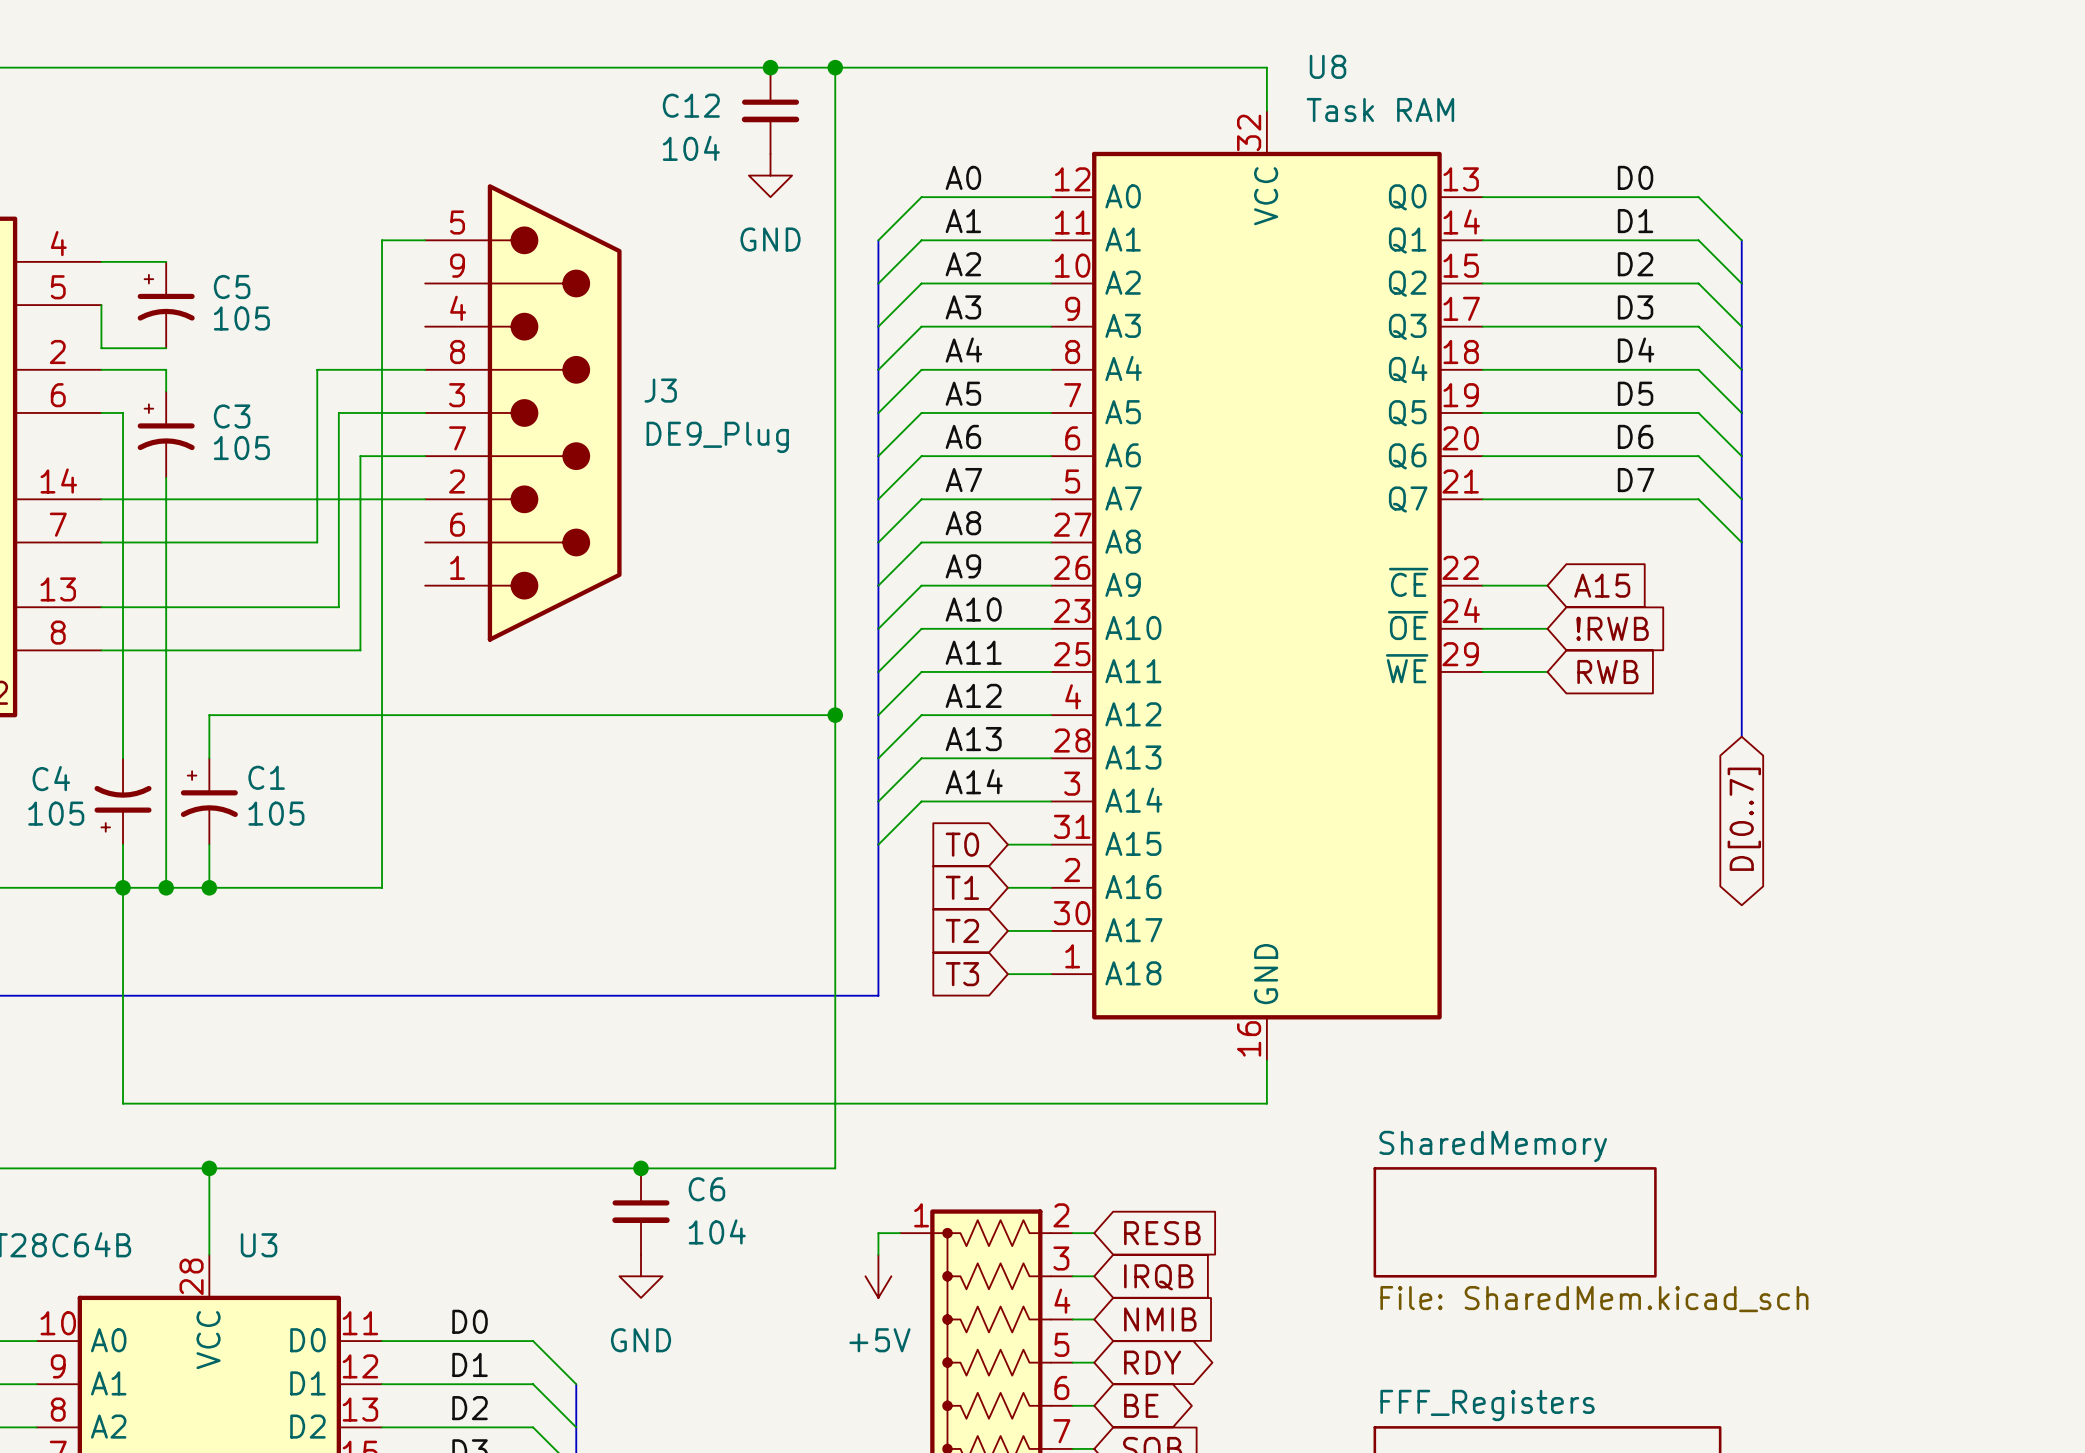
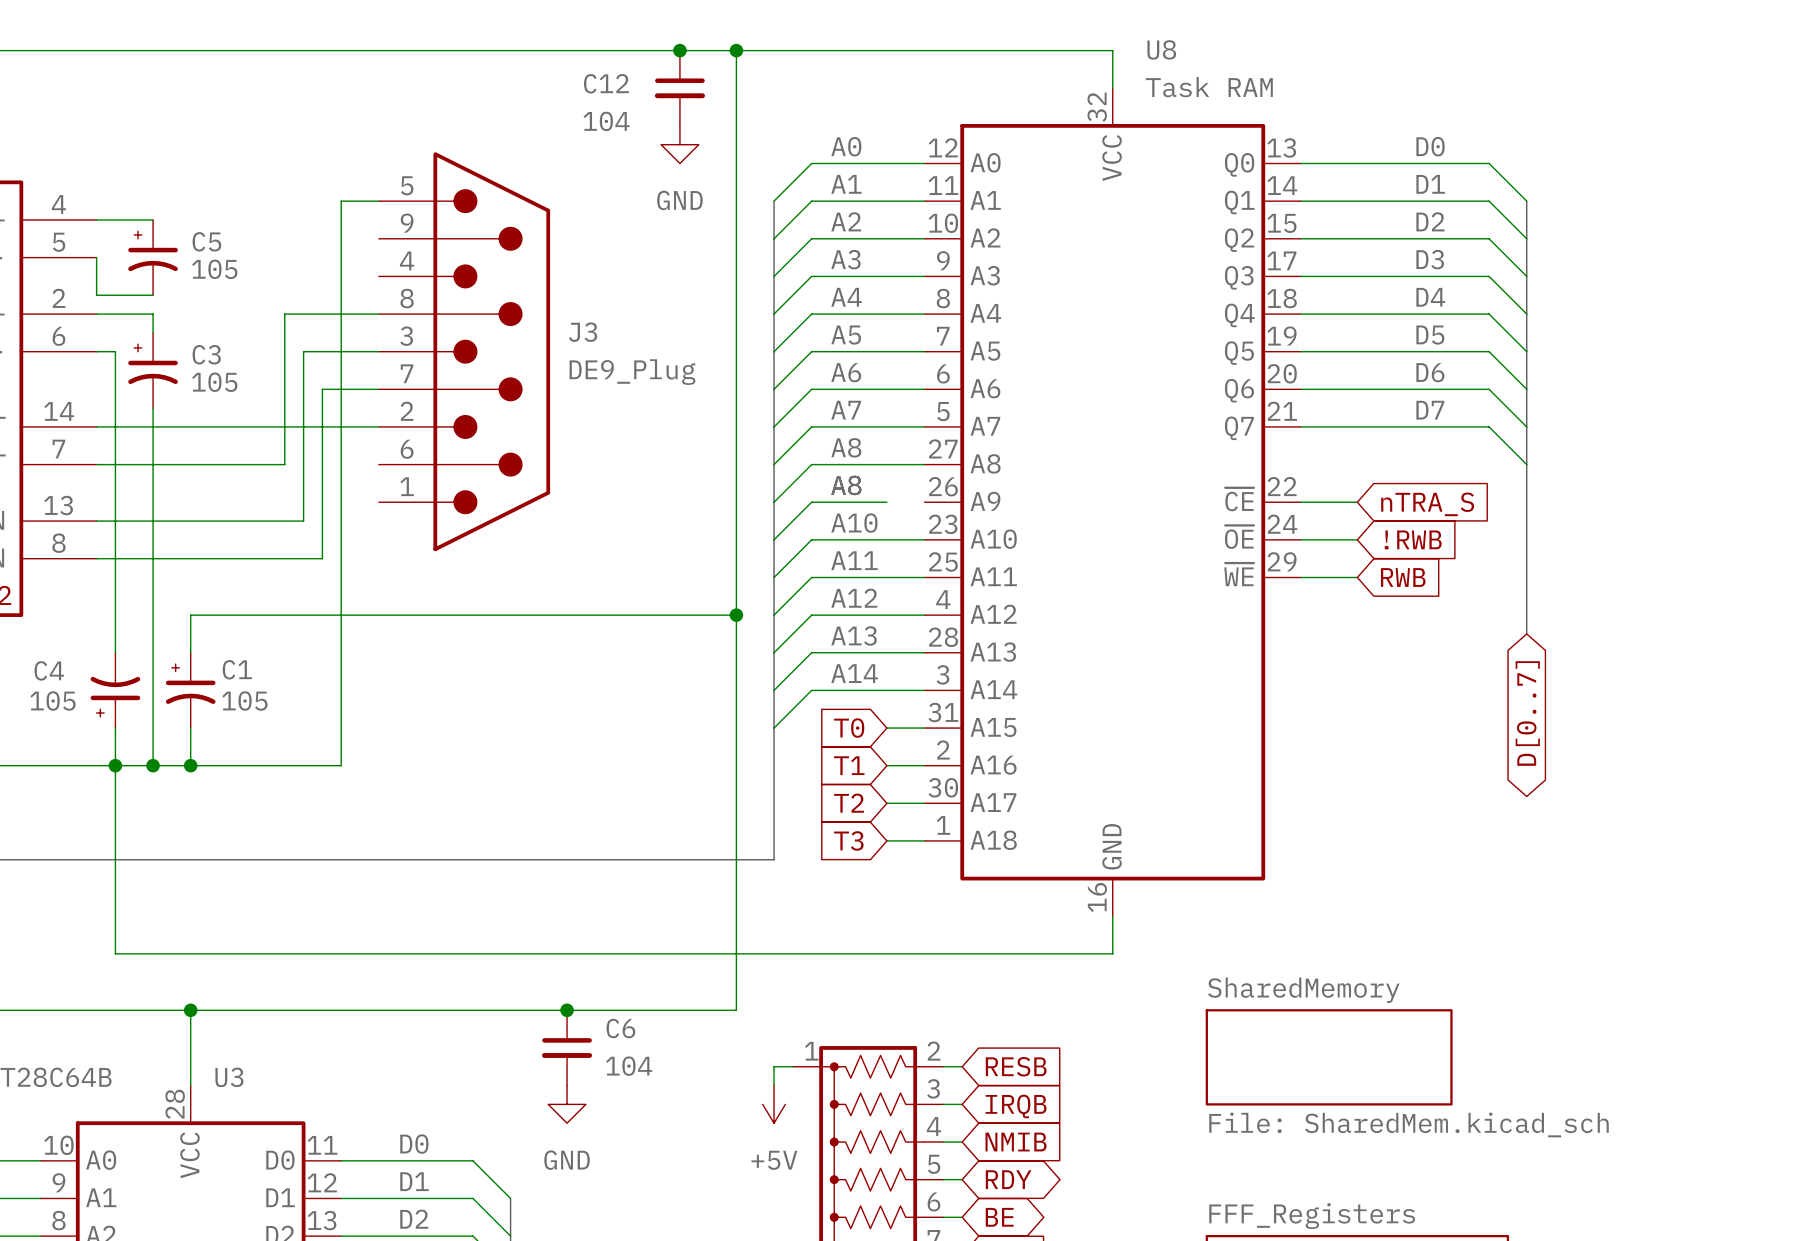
label: A9 (963, 566) -> A8 (846, 485)
wire: (1007, 585) (1051, 585) -> none
global label: A15 (1602, 585) -> nTRA_S (1427, 504)

